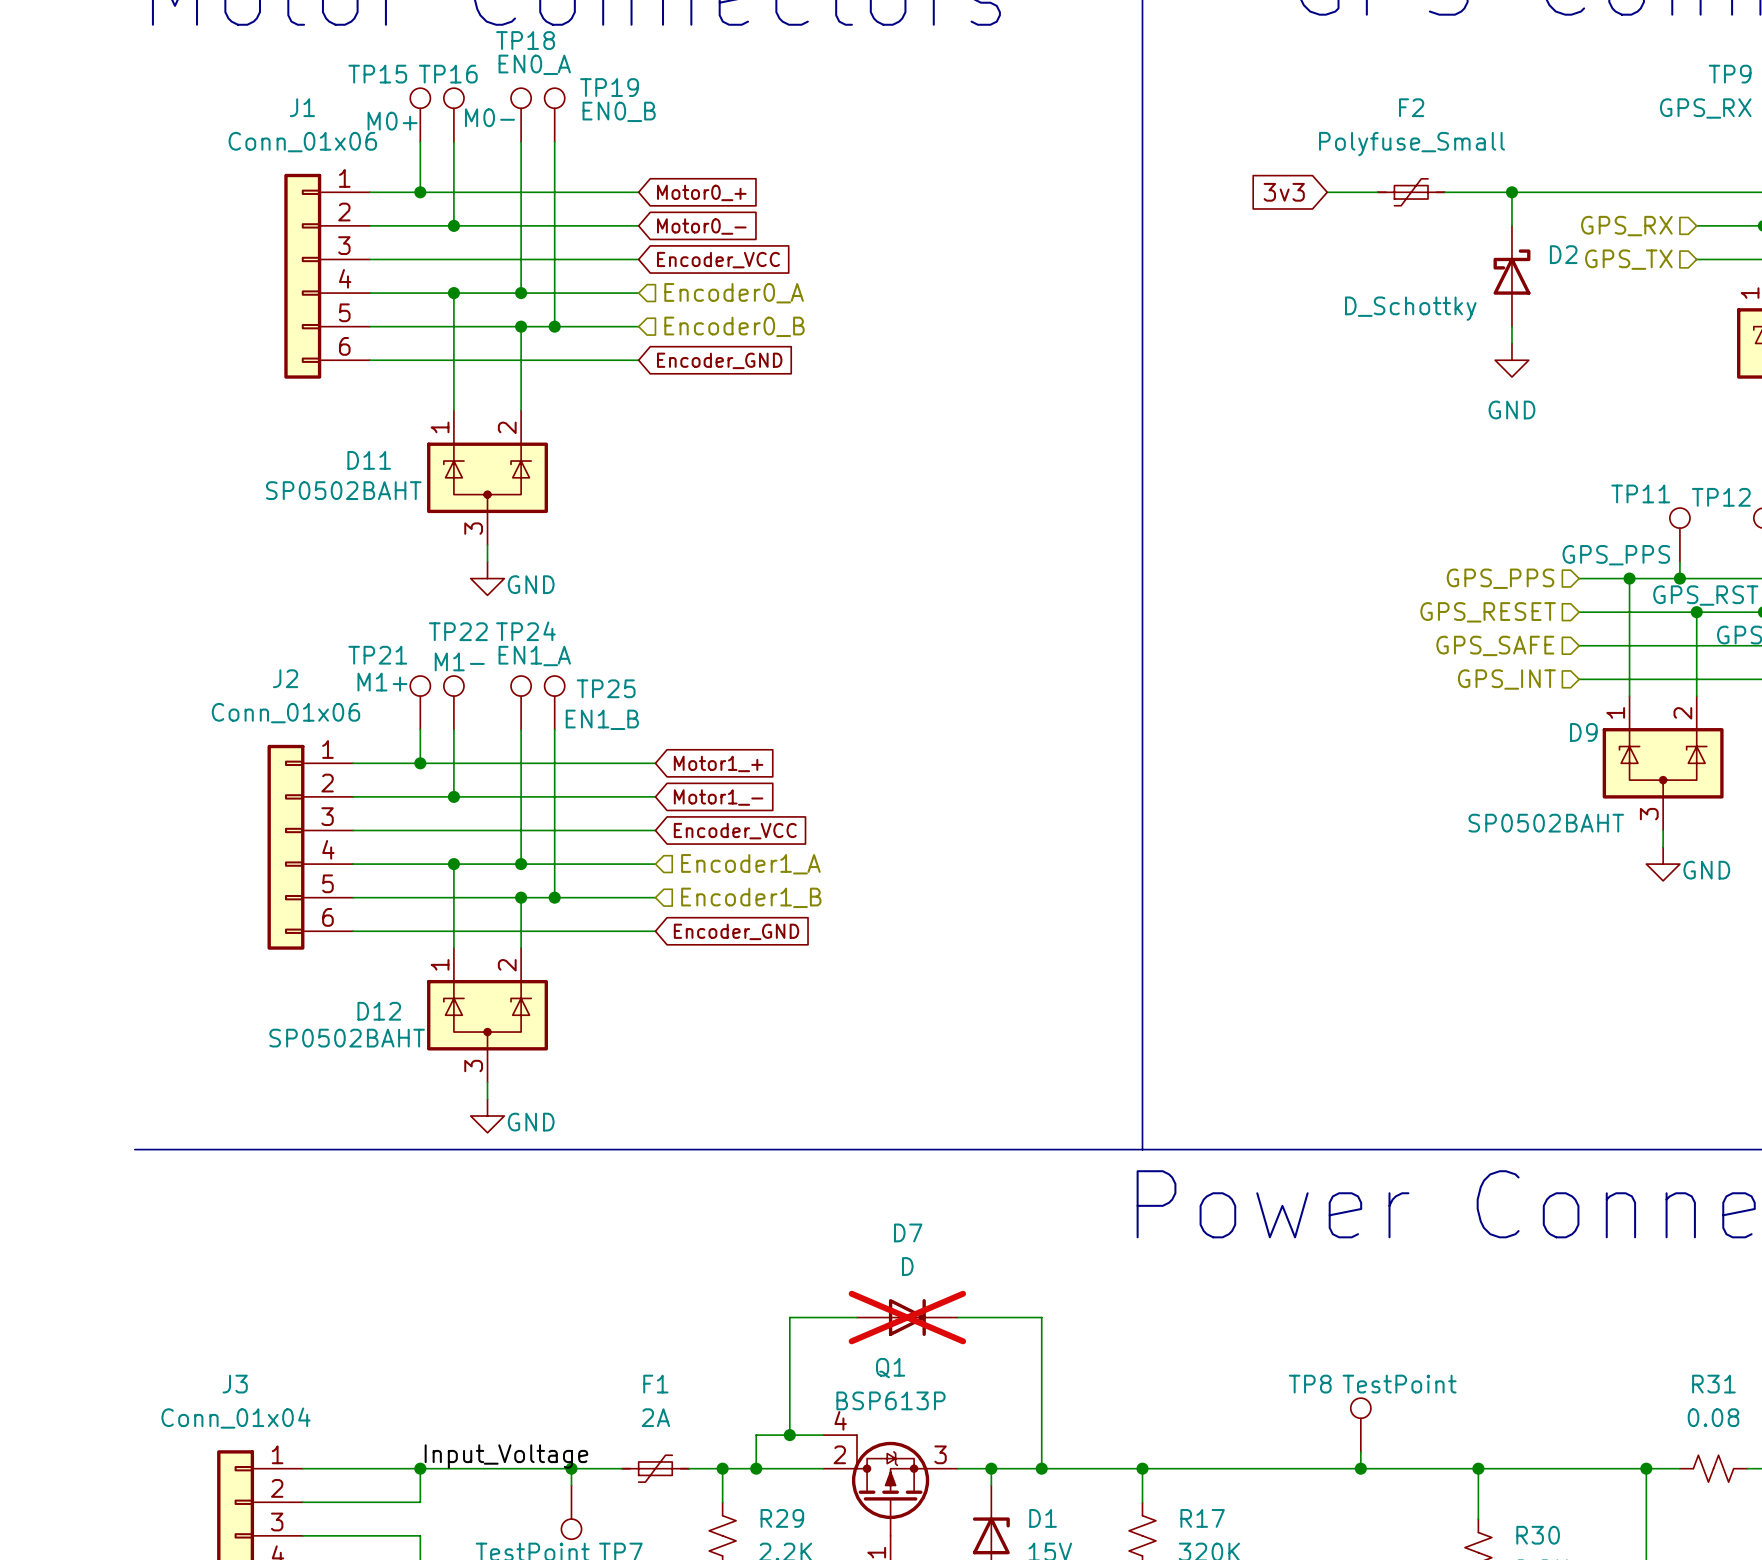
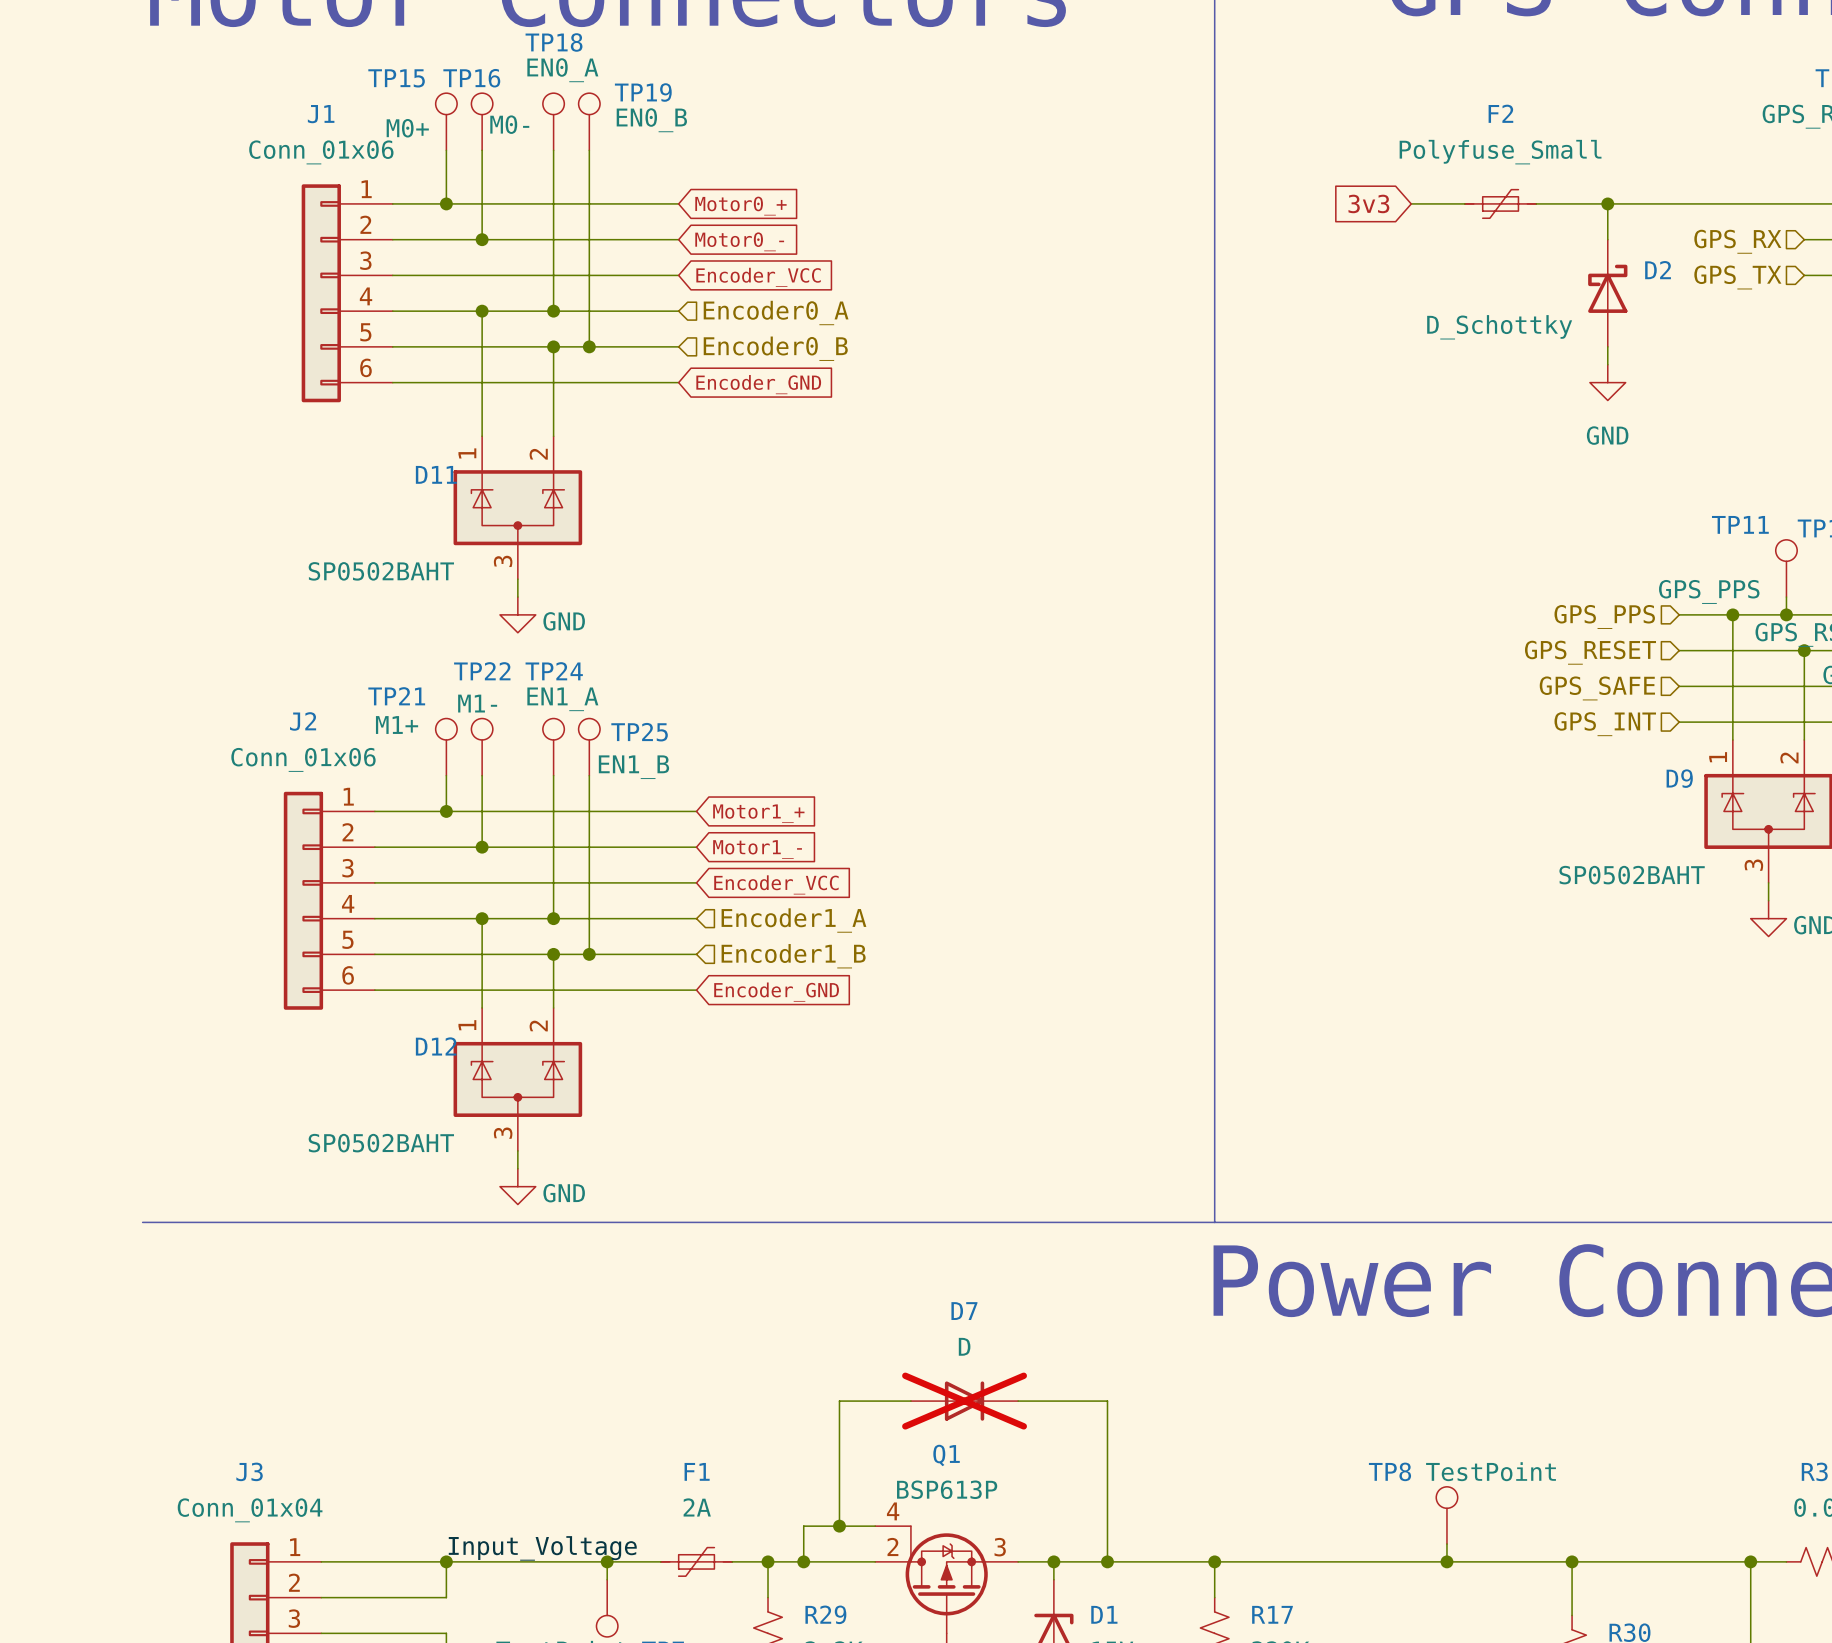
D11 name position: D11 (369, 460) -> D11 (436, 474)
D11 value position: SP0502BAHT (343, 490) -> SP0502BAHT (381, 571)
D12 name position: D12 (379, 1011) -> D12 (436, 1046)
D12 value position: SP0502BAHT (347, 1038) -> SP0502BAHT (381, 1143)

